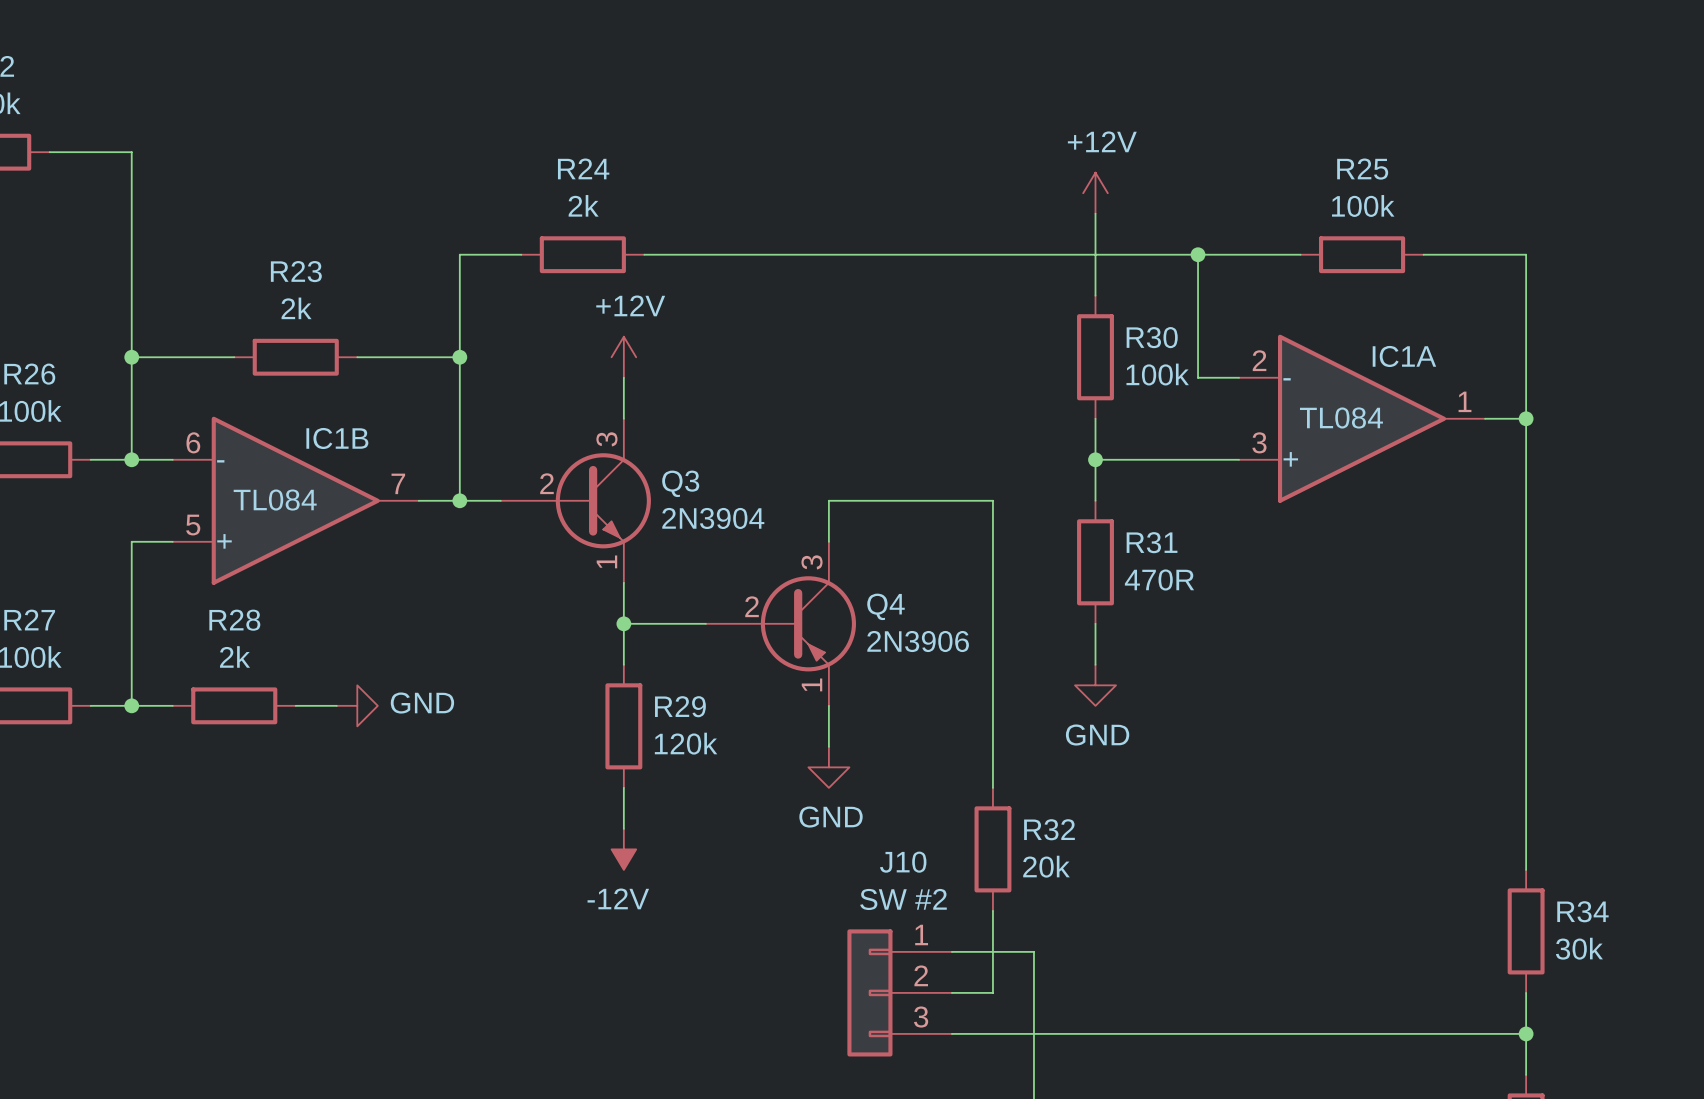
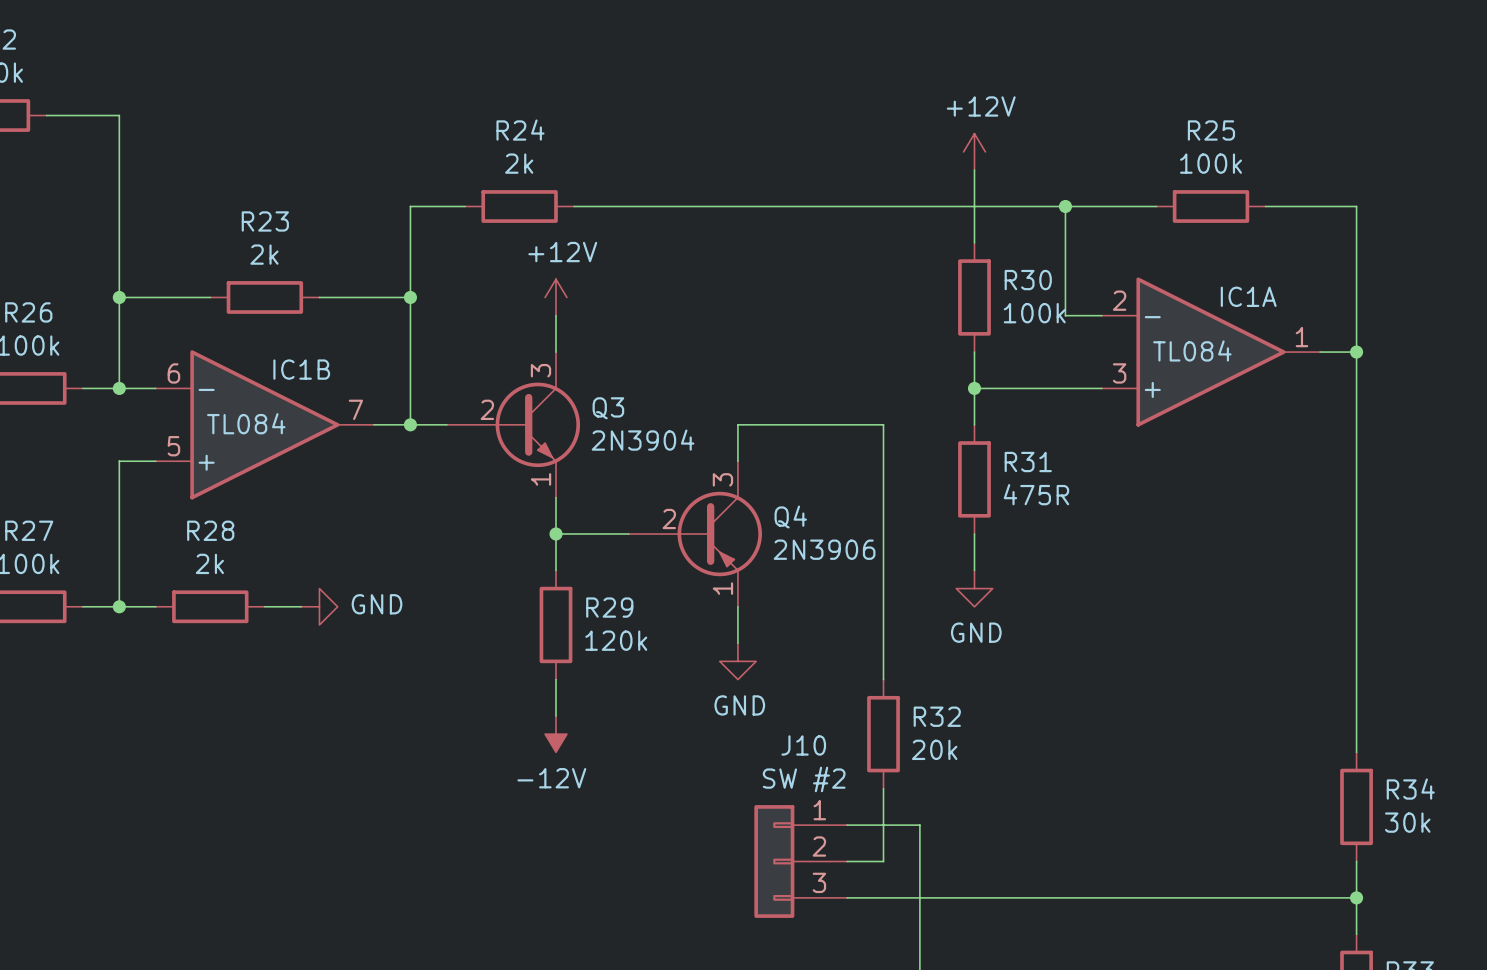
R31 value: 470R (1159, 579) -> 475R (1036, 494)

